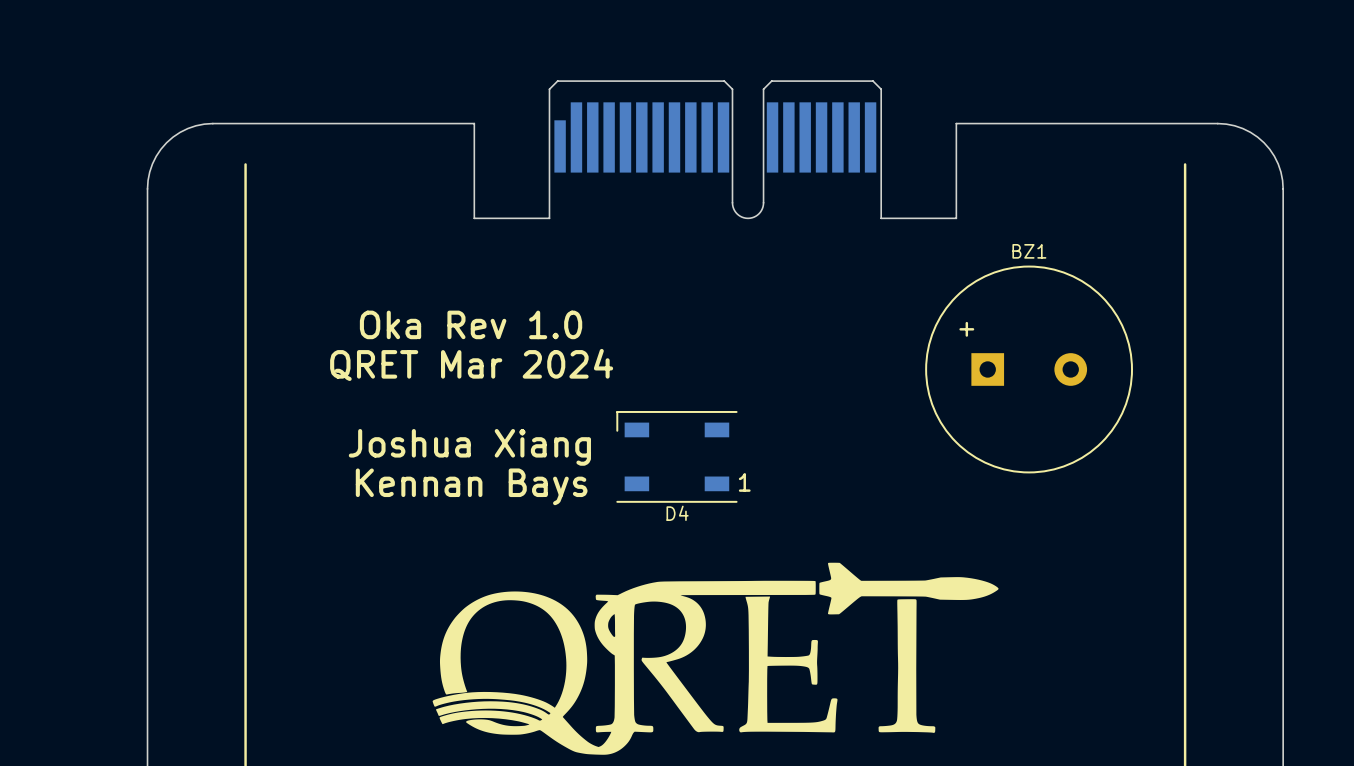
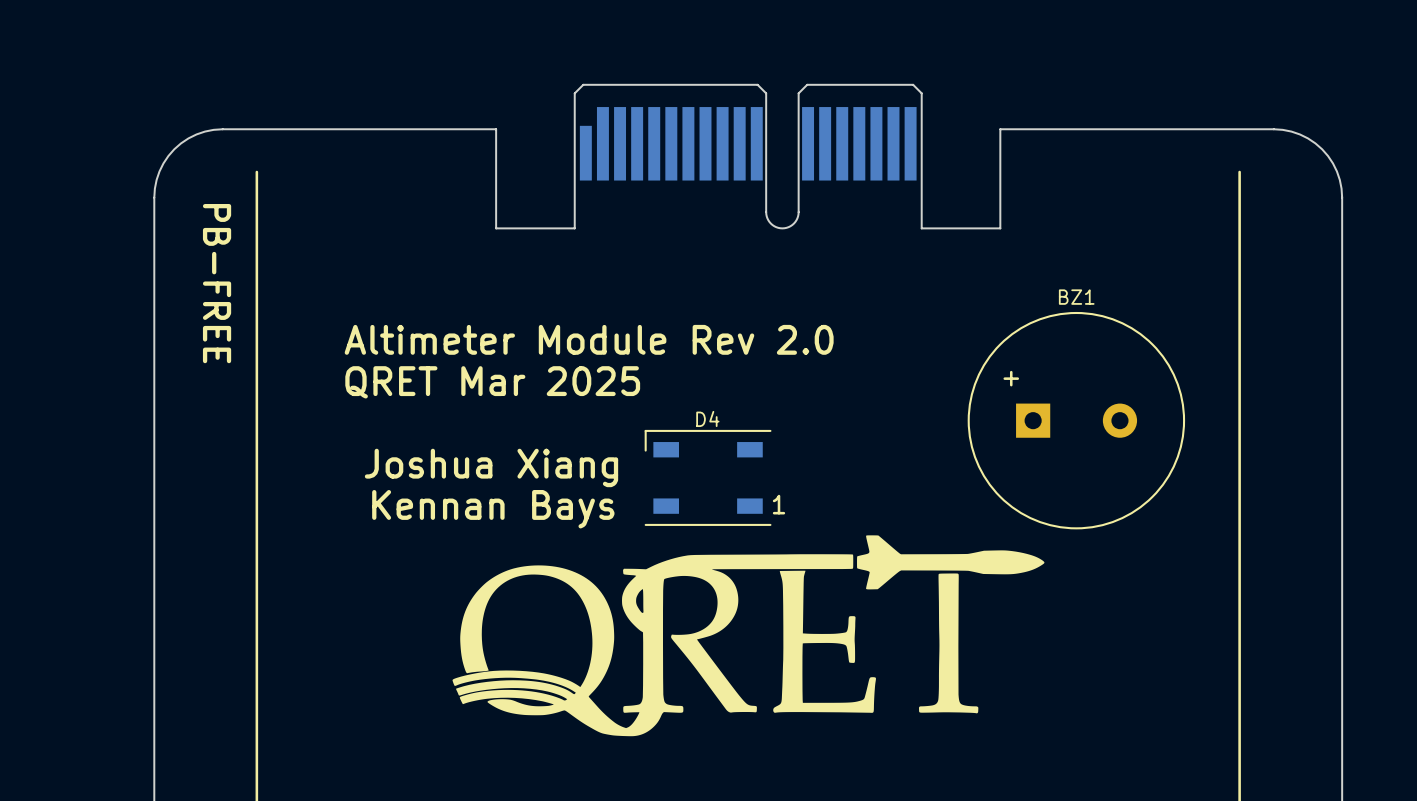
text: none -> PB-FREE (217, 283)
text: Oka Rev 1.0 (471, 324) -> Altimeter Module Rev 2.0 (589, 339)
text: QRET Mar 2024 (471, 364) -> QRET Mar 2025 (492, 382)
BZ1 position: (1029, 369) -> (1076, 420)
D4 name position: D4 (677, 513) -> D4 (707, 418)
drawing position: (908, 588) -> (950, 562)
drawing position: (788, 664) -> (824, 641)
drawing position: (906, 666) -> (948, 643)
drawing position: (624, 667) -> (652, 645)

